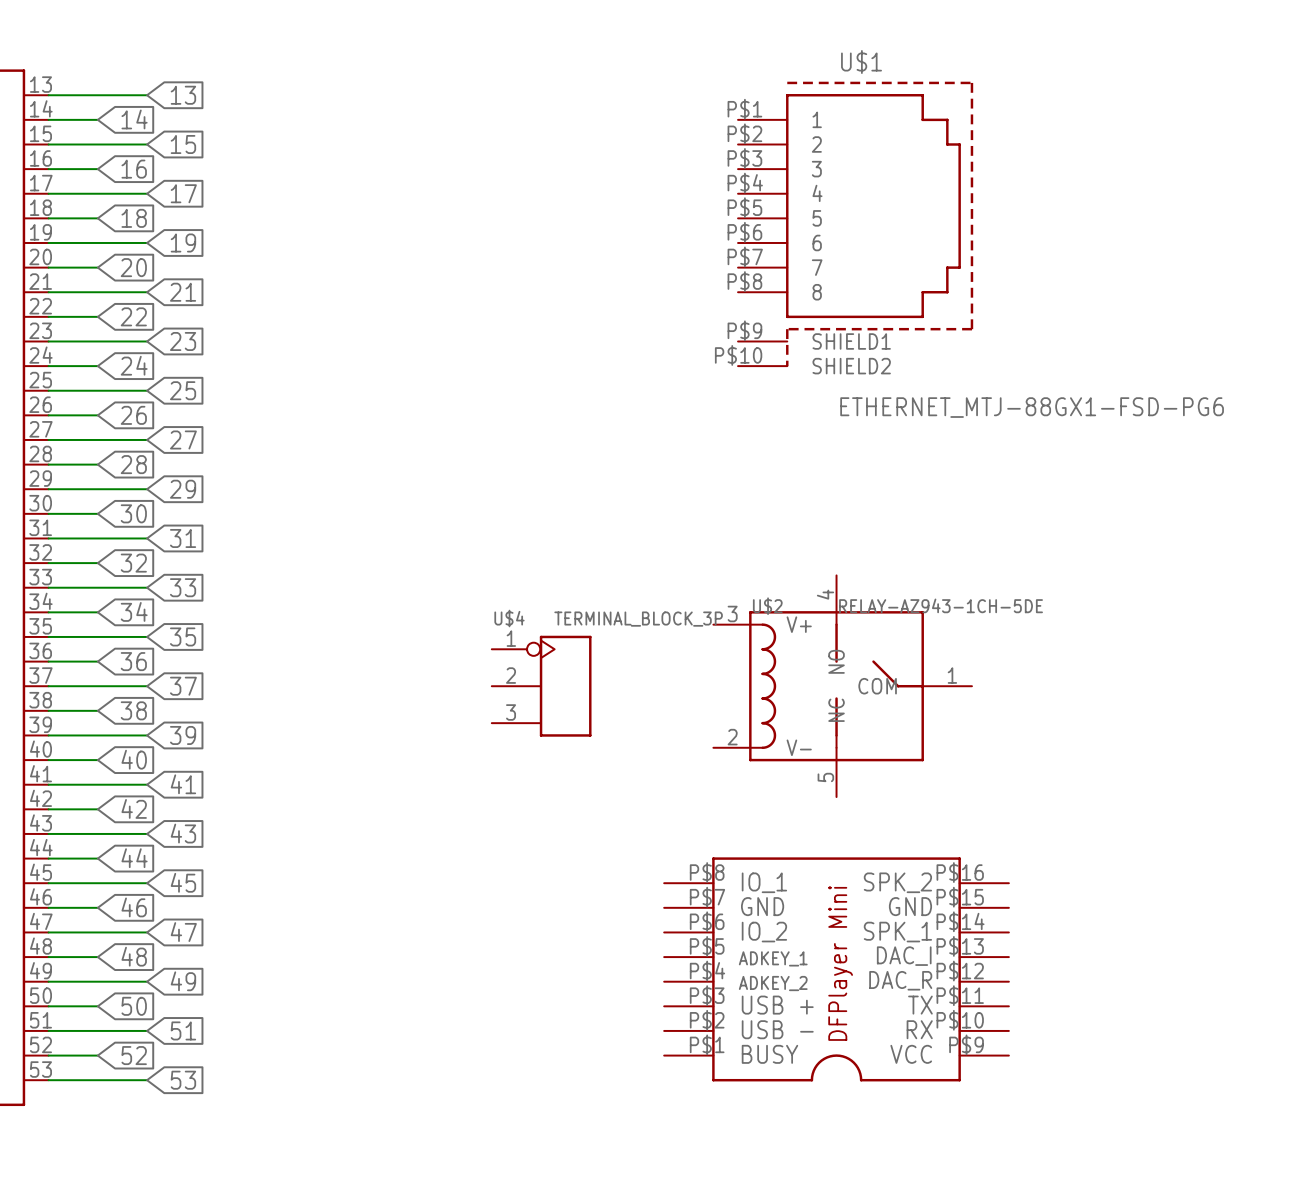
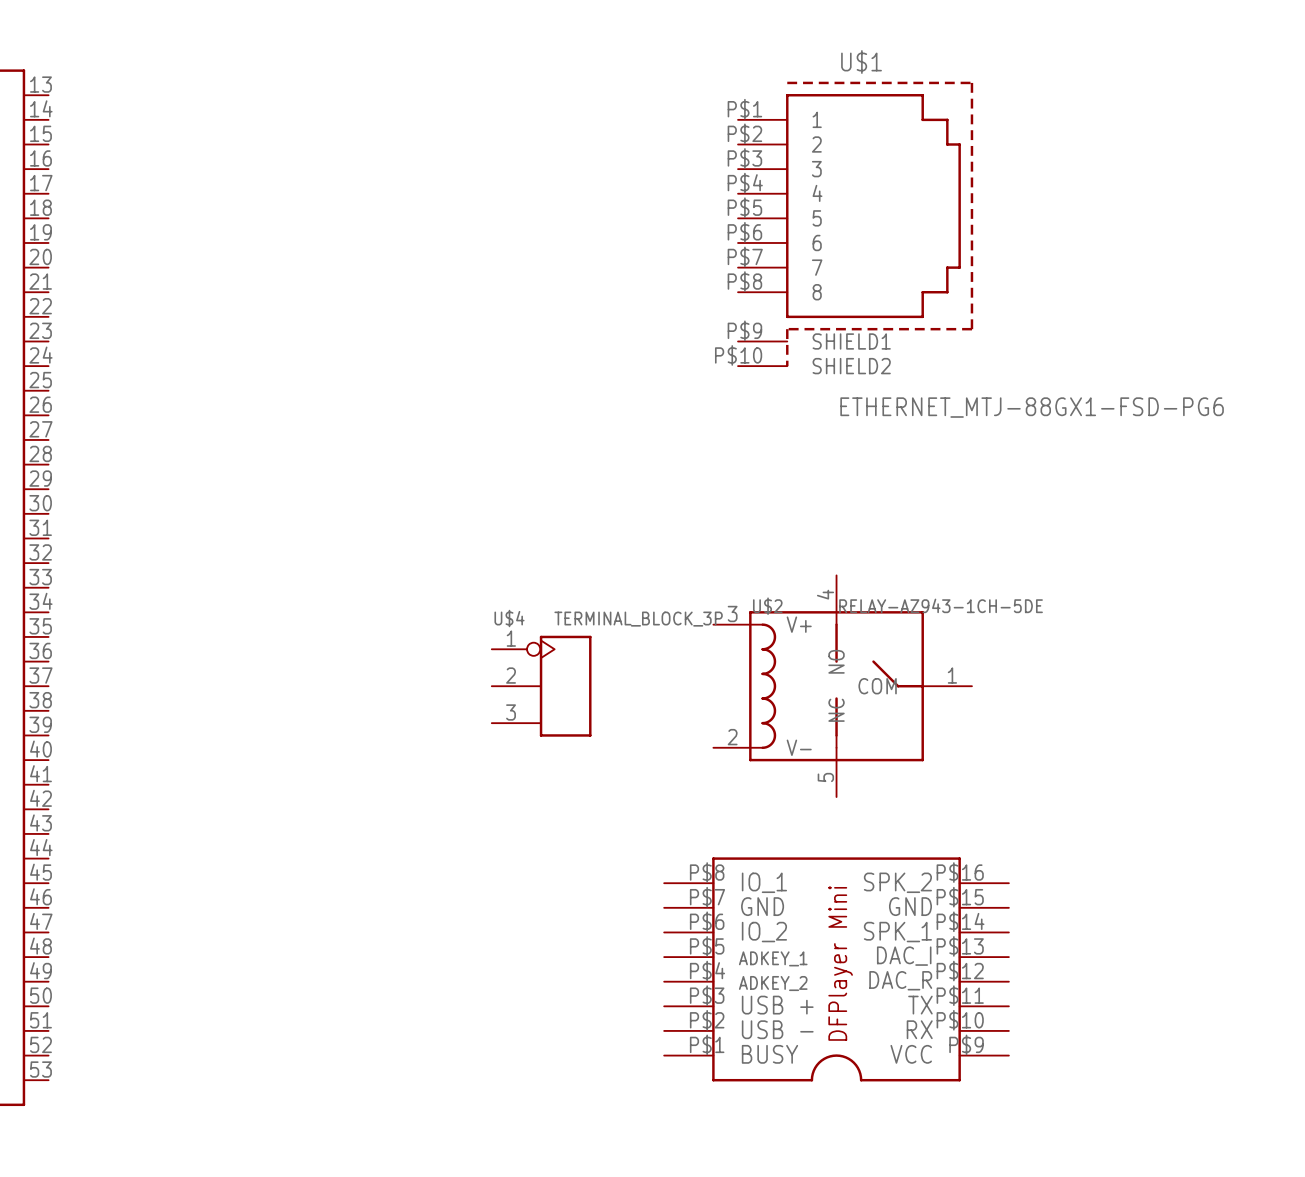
wire: (48, 95) (147, 95) -> none
global label: 13 (183, 95) -> none
wire: (48, 119) (97, 119) -> none
global label: 14 (134, 119) -> none
wire: (48, 144) (147, 144) -> none
global label: 15 (183, 144) -> none
wire: (48, 169) (97, 169) -> none
global label: 16 (134, 169) -> none
wire: (48, 193) (147, 193) -> none
global label: 17 (183, 193) -> none
wire: (48, 218) (97, 218) -> none
global label: 18 (134, 218) -> none
wire: (48, 242) (147, 242) -> none
global label: 19 (183, 242) -> none
wire: (48, 267) (97, 267) -> none
global label: 20 (133, 267) -> none
wire: (48, 292) (147, 292) -> none
global label: 21 (183, 292) -> none
wire: (48, 316) (97, 316) -> none
global label: 22 (133, 316) -> none
wire: (48, 341) (147, 341) -> none
global label: 23 (183, 341) -> none
global label: 24 (134, 365) -> none
wire: (48, 366) (97, 366) -> none
wire: (48, 390) (147, 390) -> none
global label: 25 (183, 390) -> none
wire: (48, 415) (97, 415) -> none
global label: 26 (133, 415) -> none
wire: (48, 439) (147, 439) -> none
global label: 27 (183, 439) -> none
wire: (48, 464) (97, 464) -> none
global label: 28 (133, 464) -> none
wire: (48, 489) (147, 489) -> none
global label: 29 (183, 489) -> none
wire: (48, 513) (97, 513) -> none
global label: 30 (133, 513) -> none
wire: (48, 538) (147, 538) -> none
global label: 31 (183, 538) -> none
wire: (48, 563) (97, 563) -> none
global label: 32 (133, 563) -> none
wire: (48, 587) (147, 587) -> none
global label: 33 (183, 587) -> none
global label: 34 (134, 611) -> none
wire: (48, 612) (97, 612) -> none
wire: (48, 636) (147, 636) -> none
global label: 35 (183, 636) -> none
wire: (48, 661) (97, 661) -> none
global label: 36 (133, 661) -> none
wire: (48, 686) (147, 686) -> none
global label: 37 (183, 686) -> none
wire: (48, 710) (97, 710) -> none
global label: 38 (133, 710) -> none
wire: (48, 735) (147, 735) -> none
global label: 39 (183, 735) -> none
global label: 40 (134, 759) -> none
wire: (48, 760) (97, 760) -> none
wire: (48, 784) (147, 784) -> none
global label: 41 (183, 784) -> none
global label: 42 (134, 808) -> none
wire: (48, 809) (97, 809) -> none
wire: (48, 833) (147, 833) -> none
global label: 43 (183, 833) -> none
wire: (48, 858) (97, 858) -> none
global label: 44 (134, 858) -> none
global label: 45 (183, 882) -> none
wire: (48, 883) (147, 883) -> none
wire: (48, 907) (97, 907) -> none
global label: 46 (134, 907) -> none
wire: (48, 932) (147, 932) -> none
global label: 47 (183, 932) -> none
global label: 48 (134, 956) -> none
wire: (48, 957) (97, 957) -> none
wire: (48, 981) (147, 981) -> none
global label: 49 (183, 981) -> none
wire: (48, 1006) (97, 1006) -> none
global label: 50 (134, 1006) -> none
wire: (48, 1030) (147, 1030) -> none
global label: 51 (183, 1030) -> none
wire: (48, 1055) (97, 1055) -> none
global label: 52 (134, 1055) -> none
wire: (48, 1080) (147, 1080) -> none
global label: 53 (183, 1080) -> none

